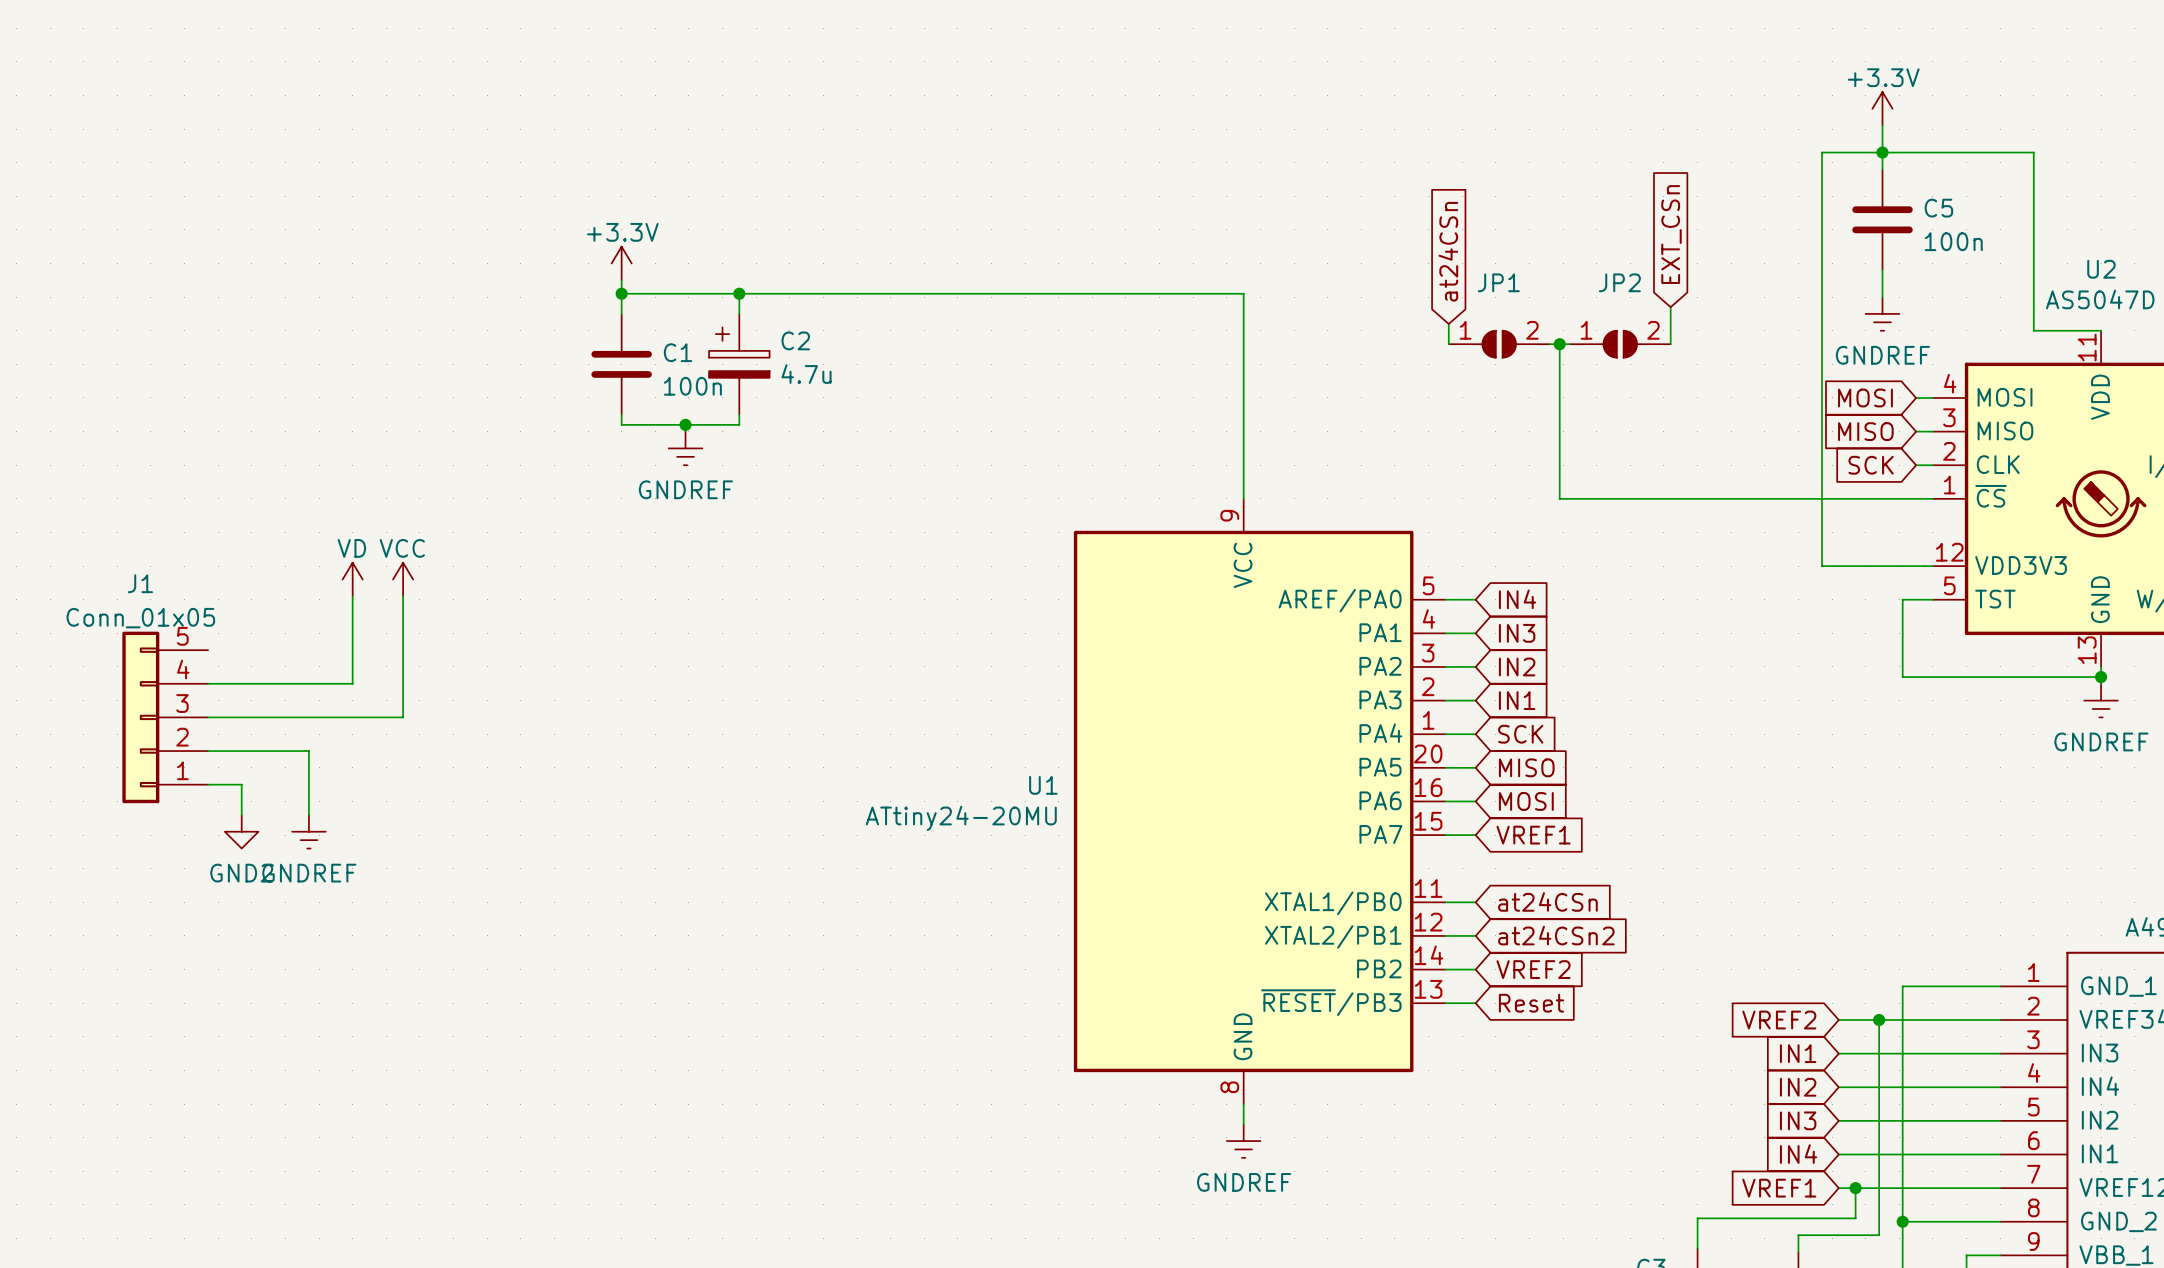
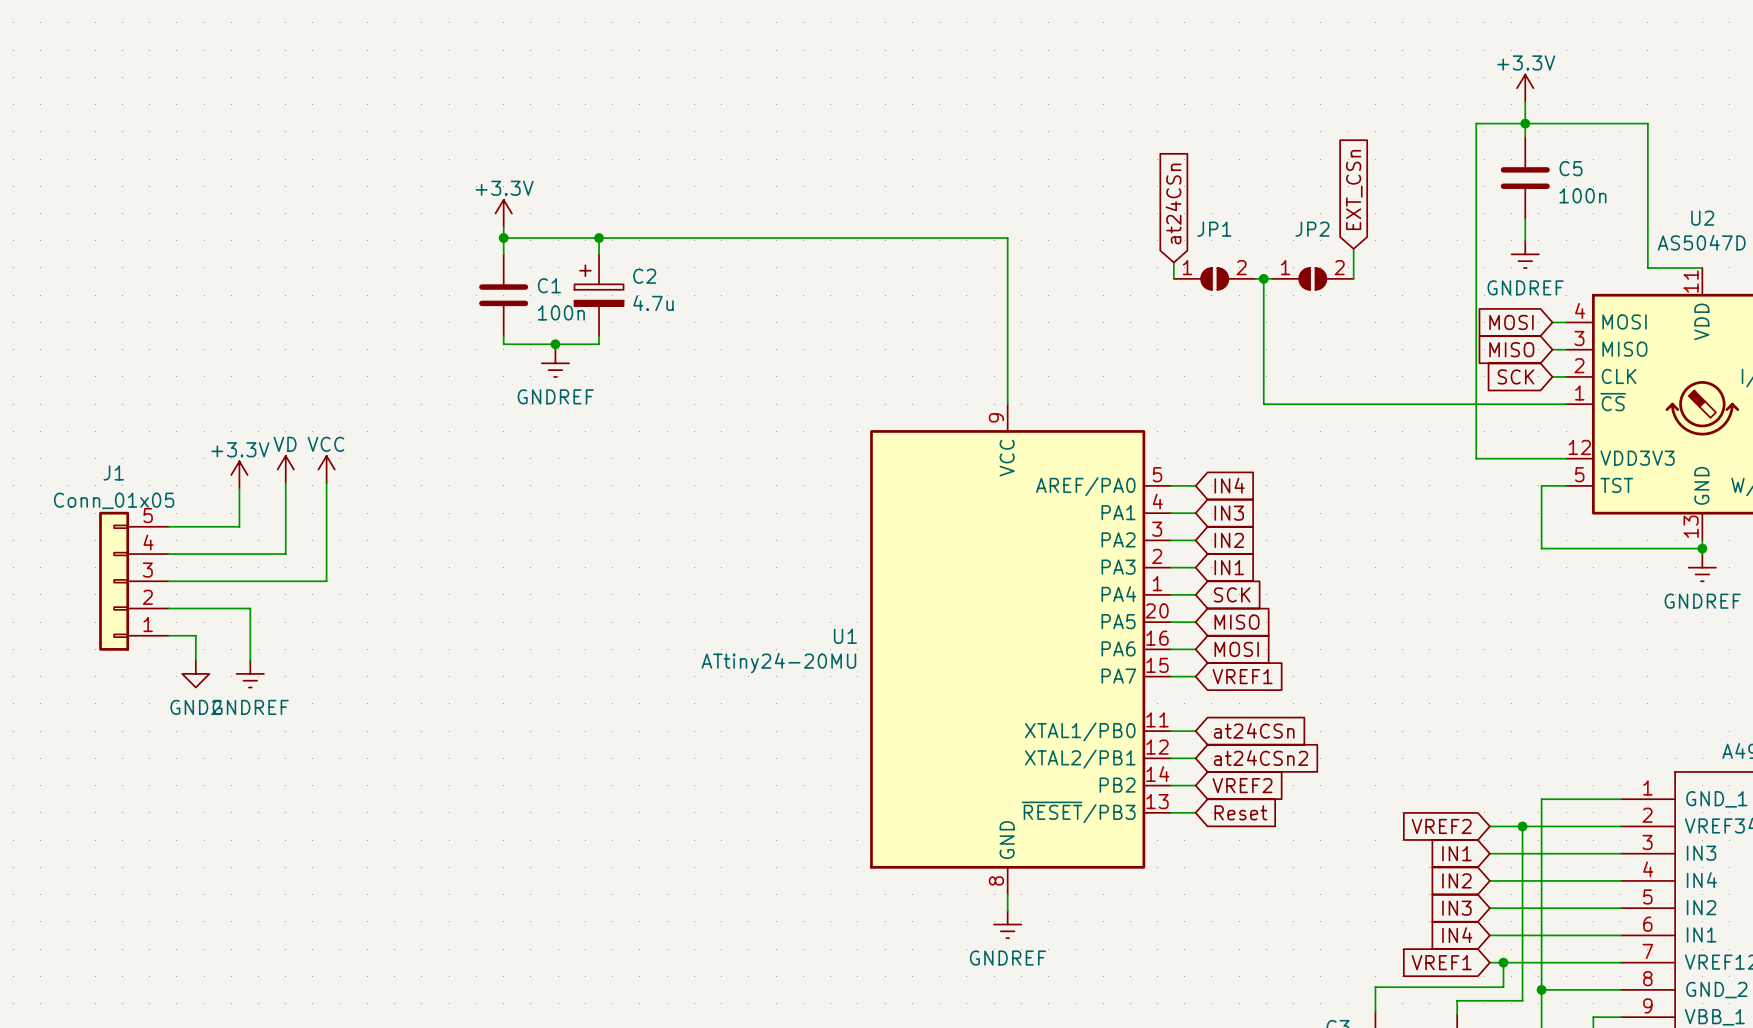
power symbol: none -> +3.3V (239, 475)
wire: none -> (239, 488) (239, 526) (168, 526)

